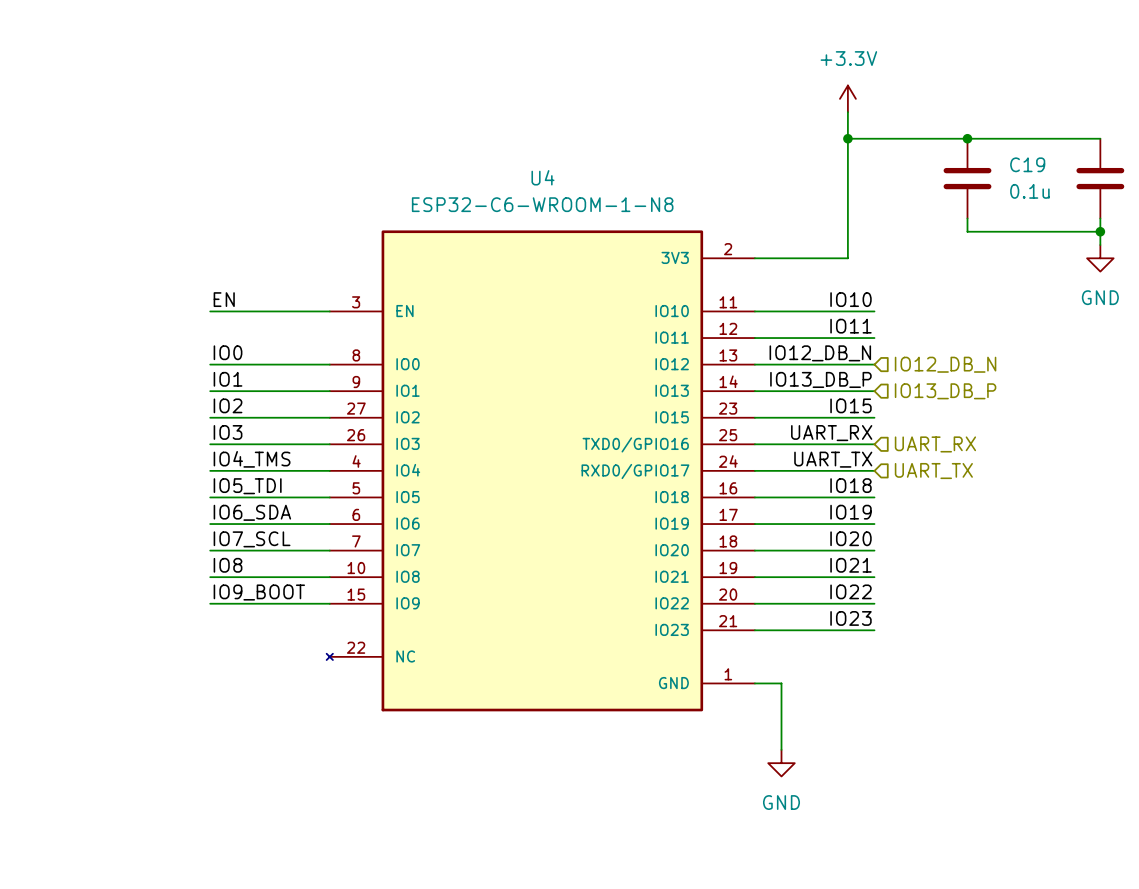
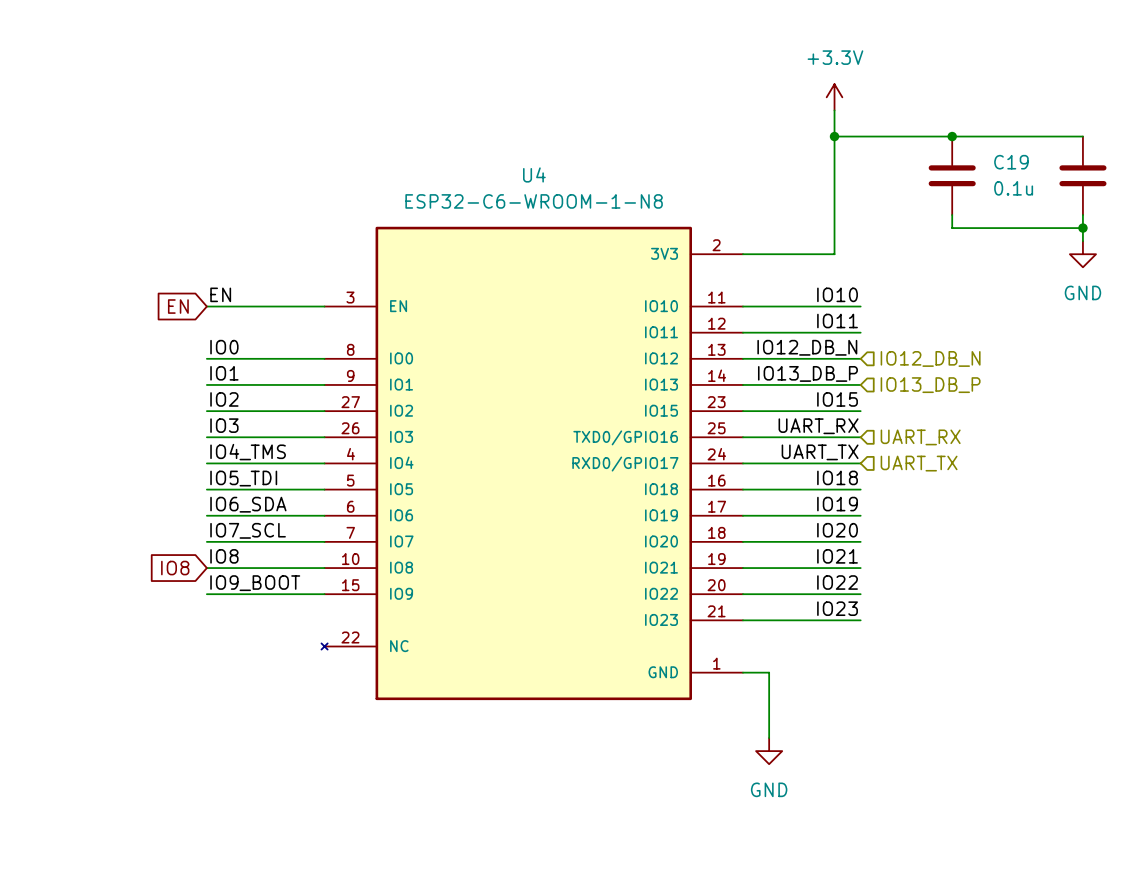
global label: none -> EN (178, 306)
global label: none -> IO8 (175, 568)

